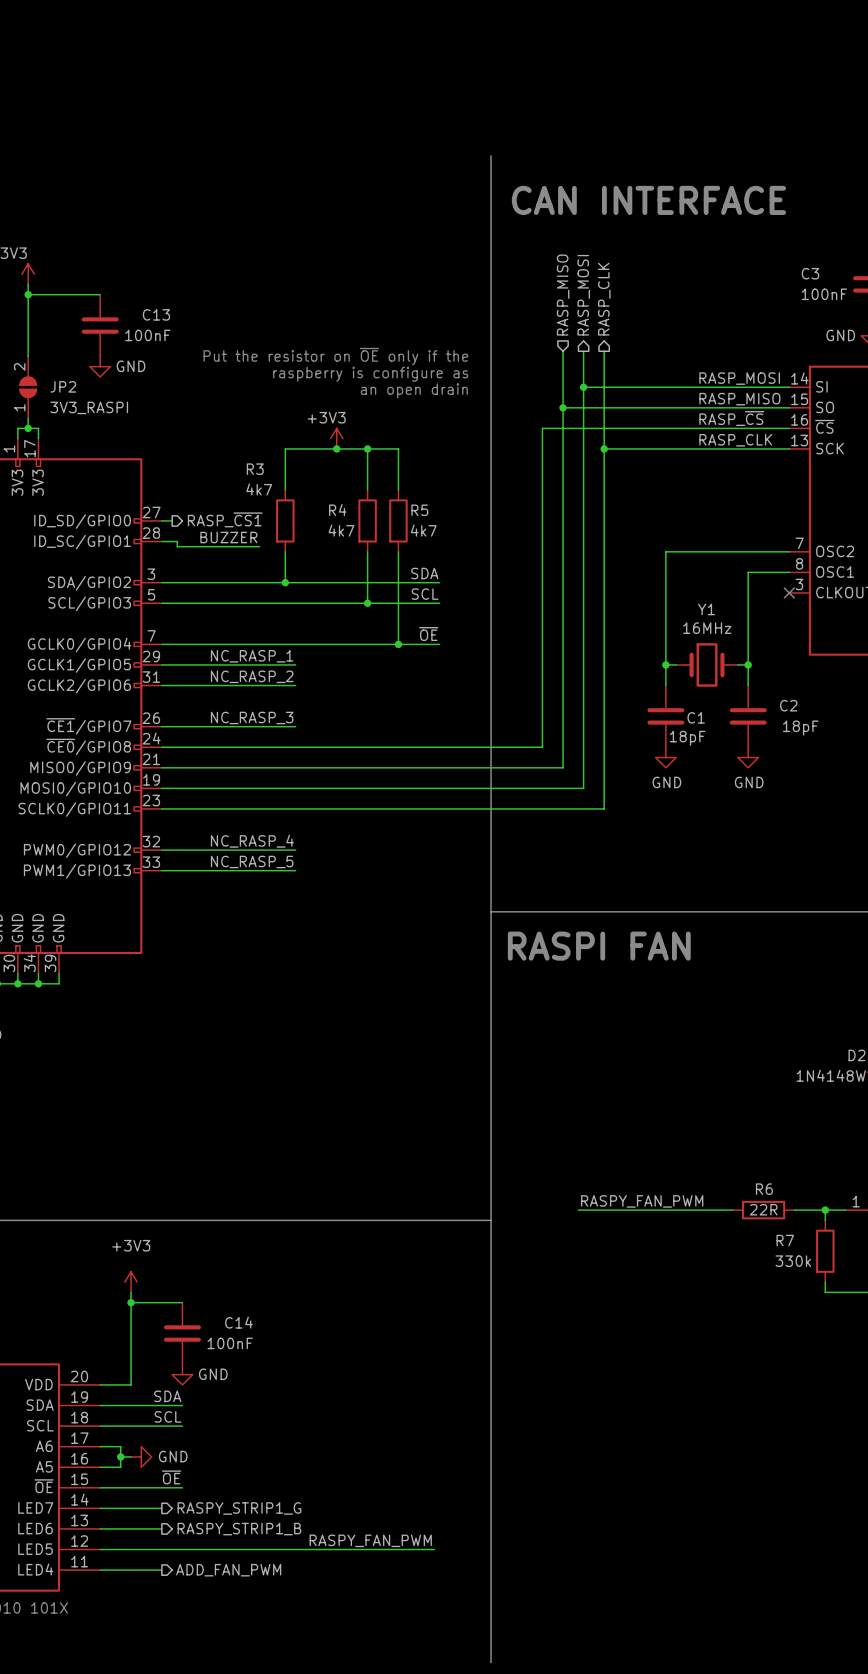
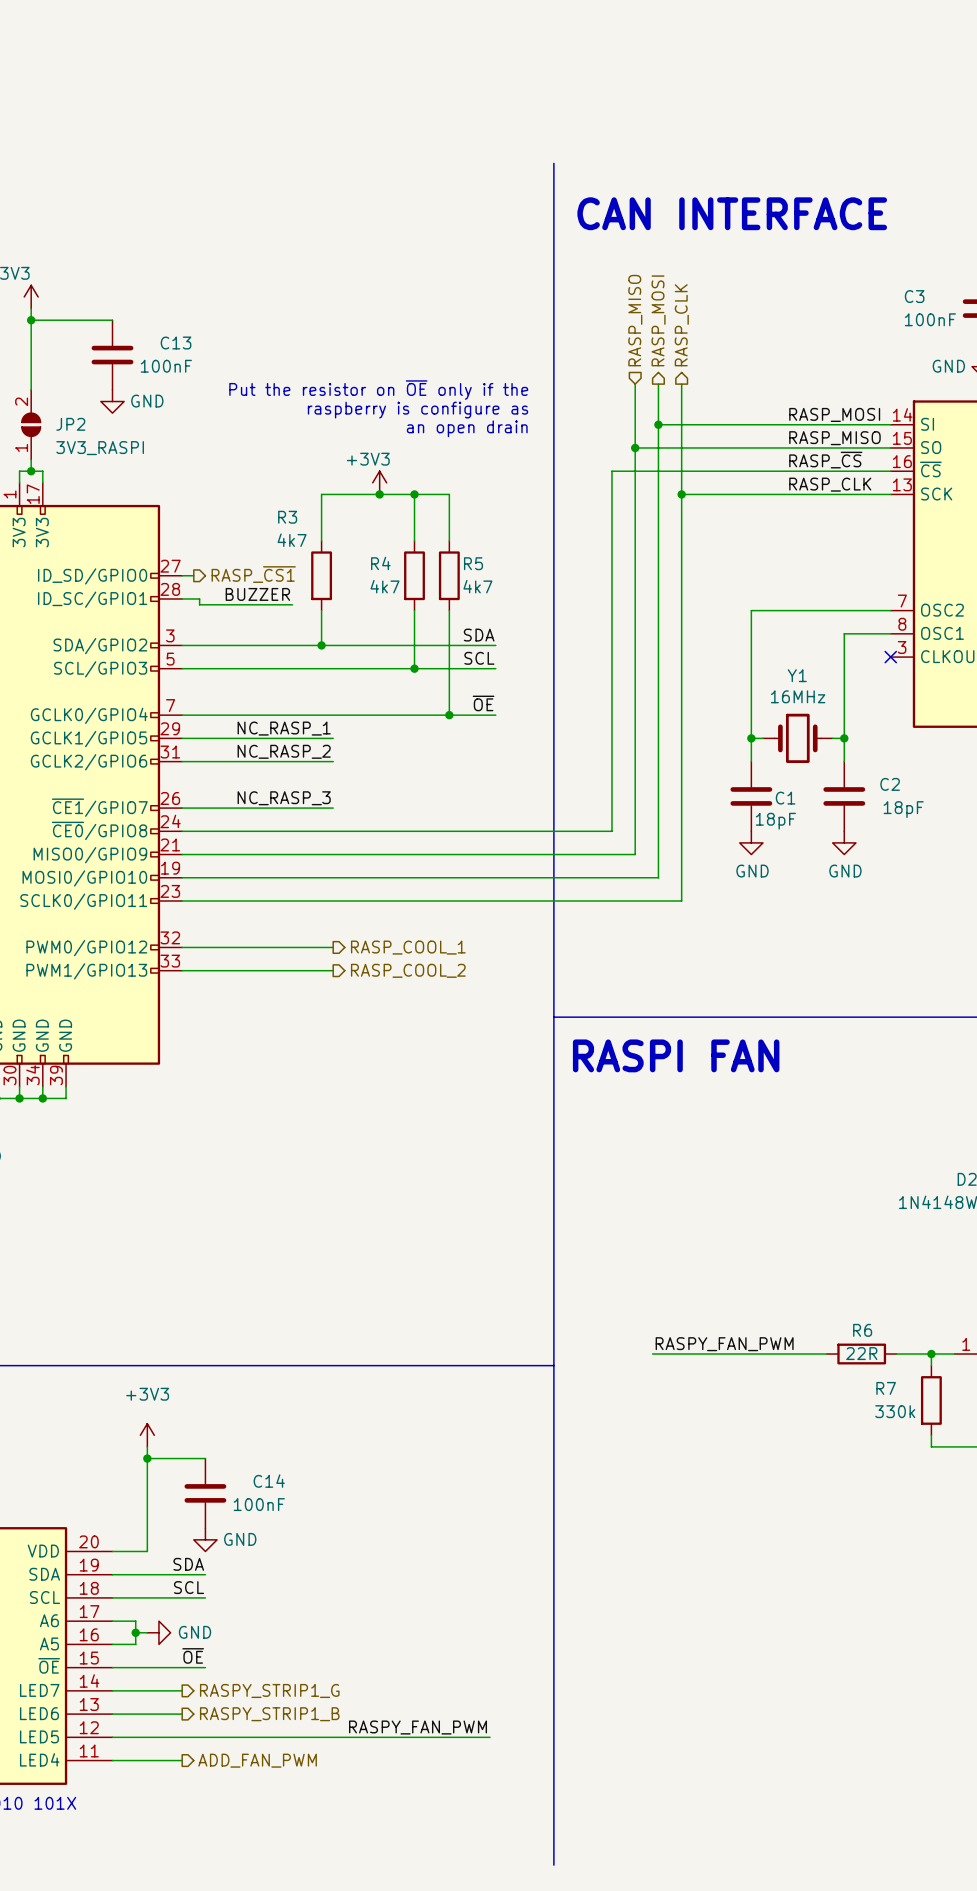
label: NC_RASP_4 (252, 841) -> none
hierarchical label: none -> RASP_COOL_1 (408, 947)
label: NC_RASP_5 (252, 861) -> none
hierarchical label: none -> RASP_COOL_2 (408, 970)

